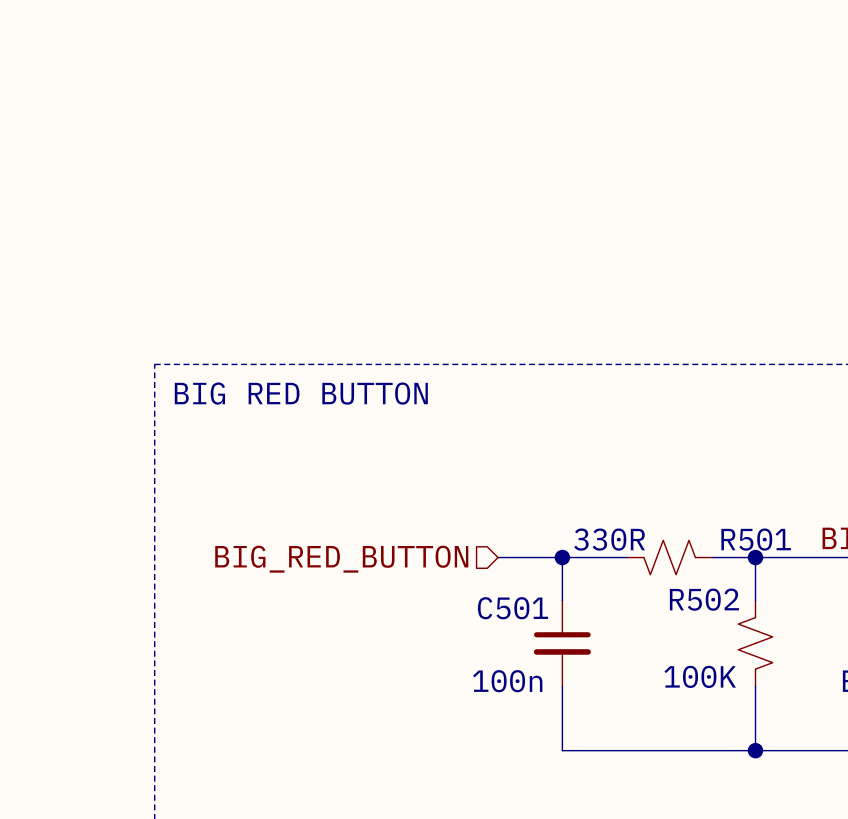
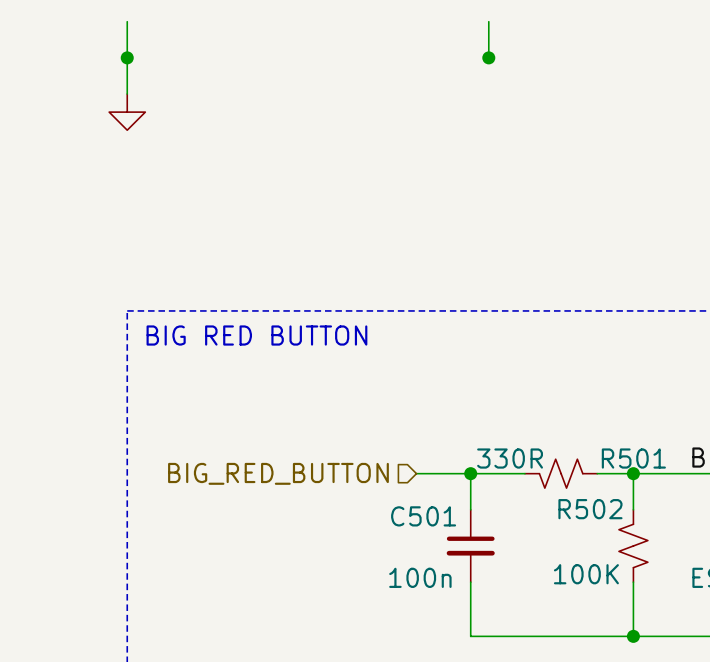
wire: none -> (127, 21) (127, 94)
wire: none -> (488, 21) (488, 57)
junction: none -> (127, 57)
junction: none -> (488, 57)
power symbol: none -> (127, 112)

